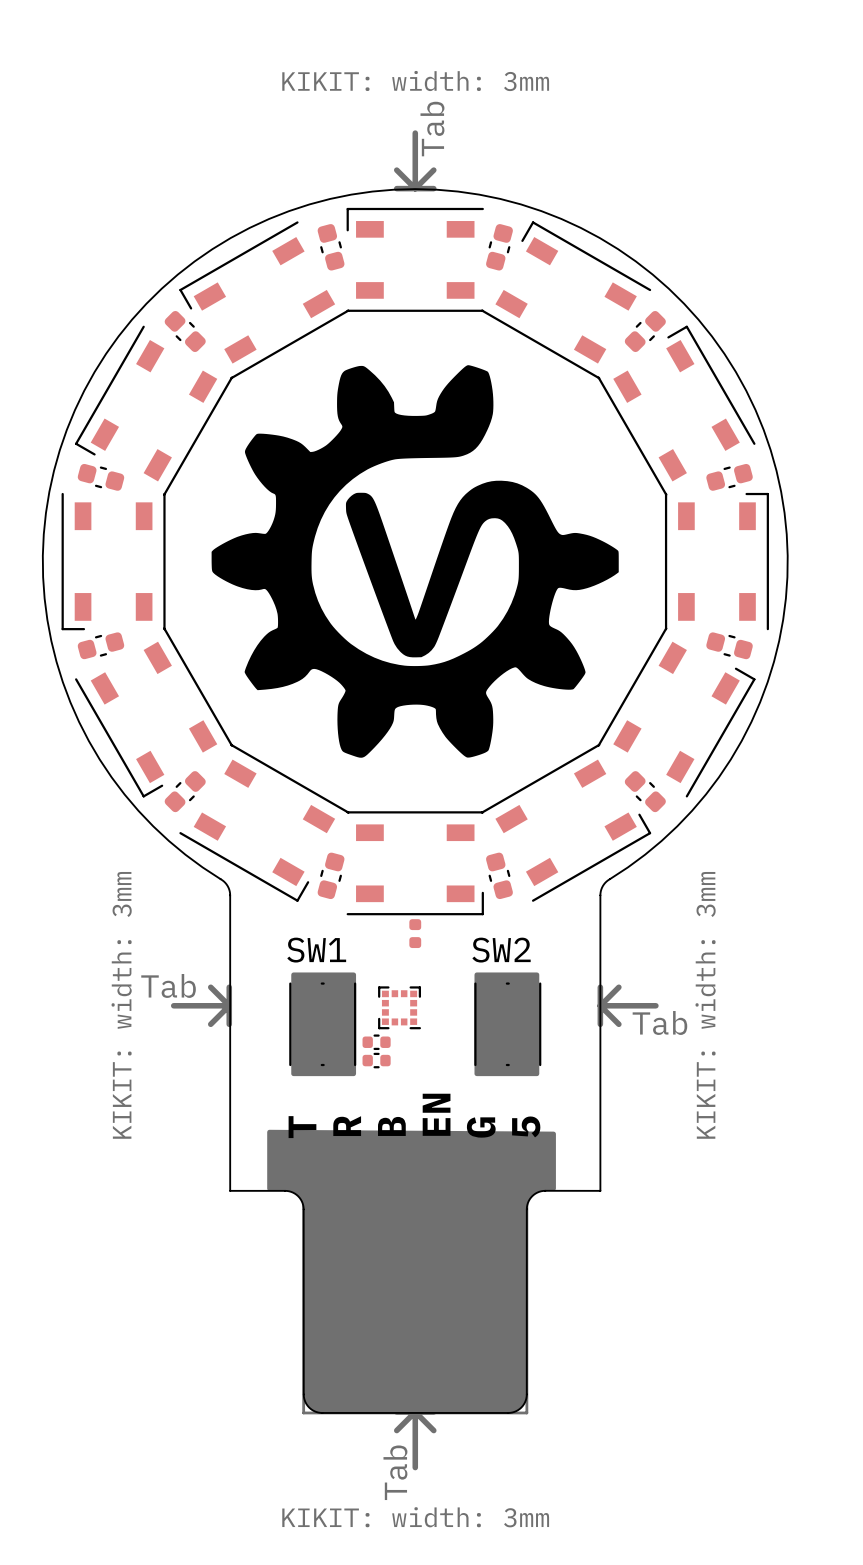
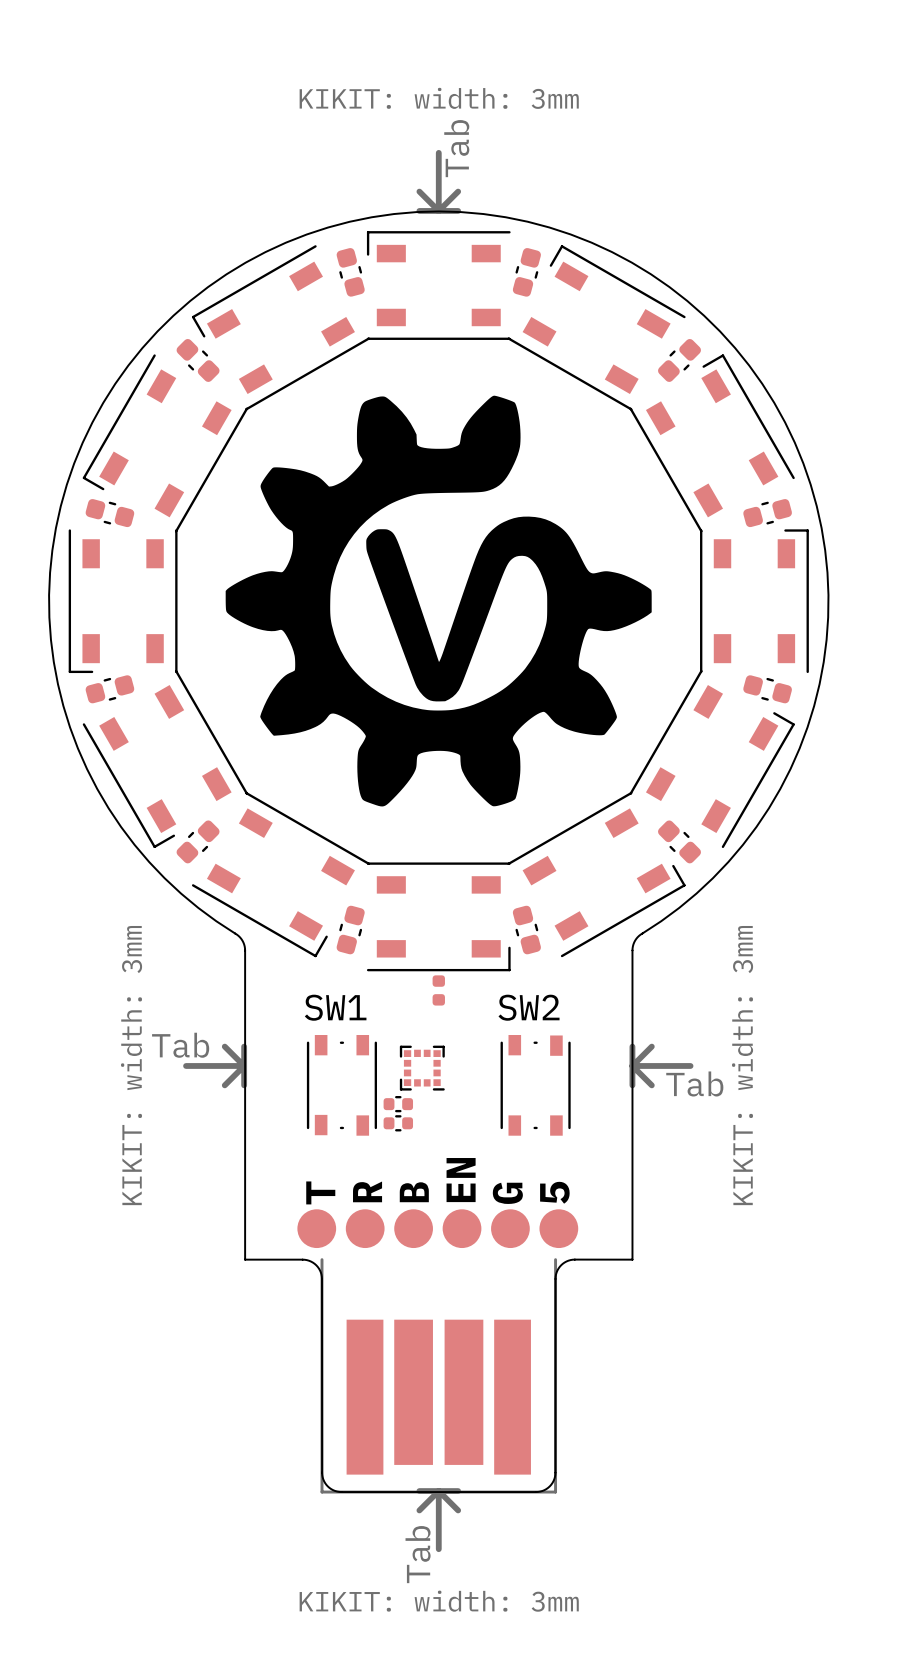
drawing: [291, 972, 357, 1077] -> none
drawing: [474, 972, 540, 1077] -> none
drawing: [267, 1129, 556, 1413] -> none

